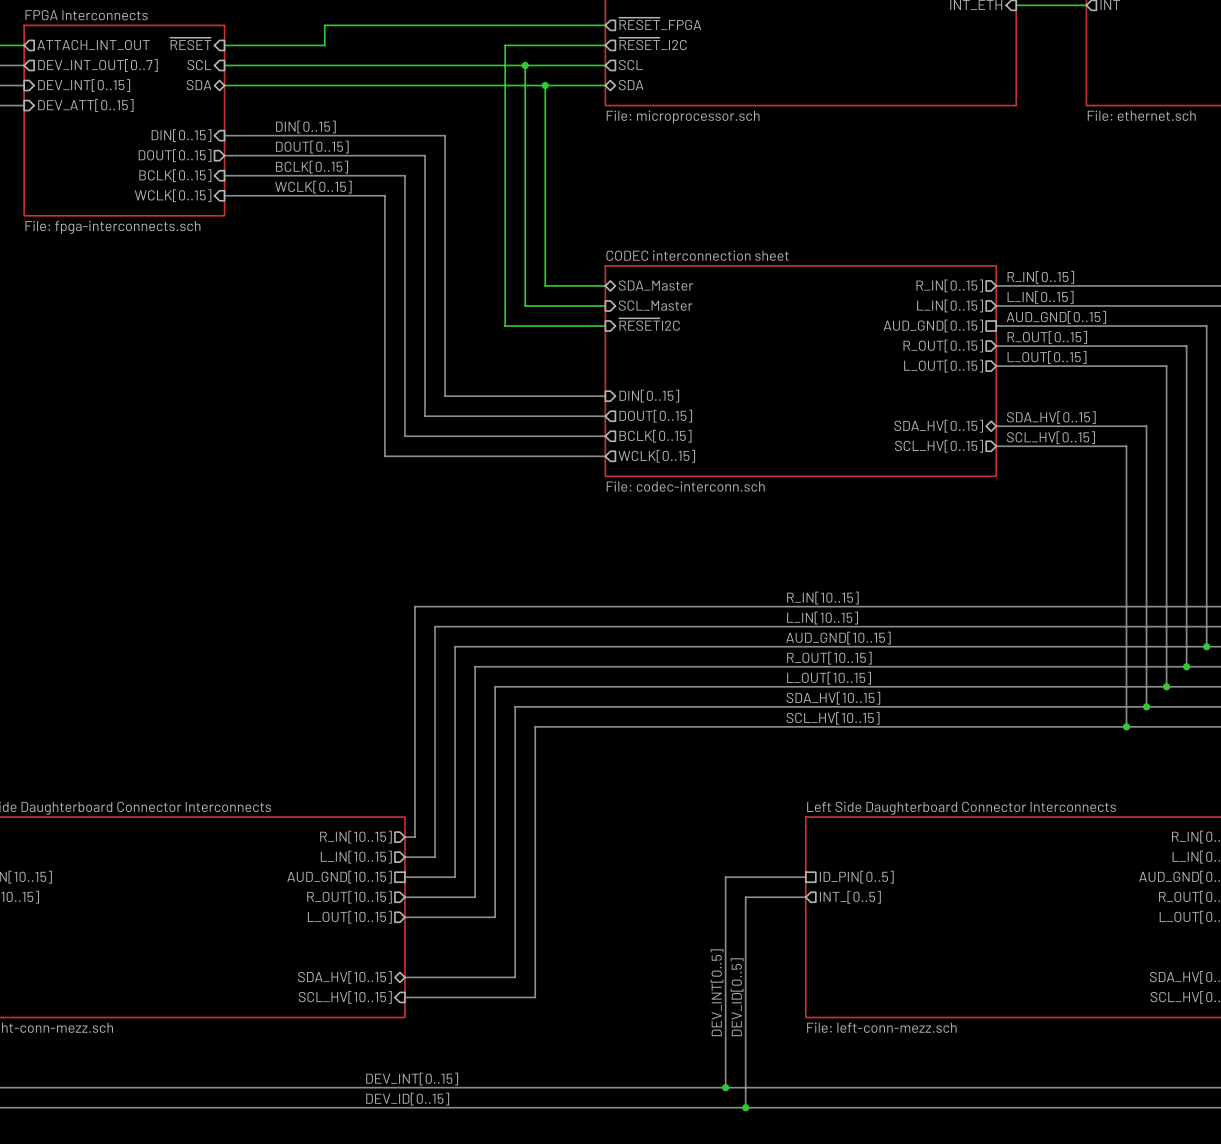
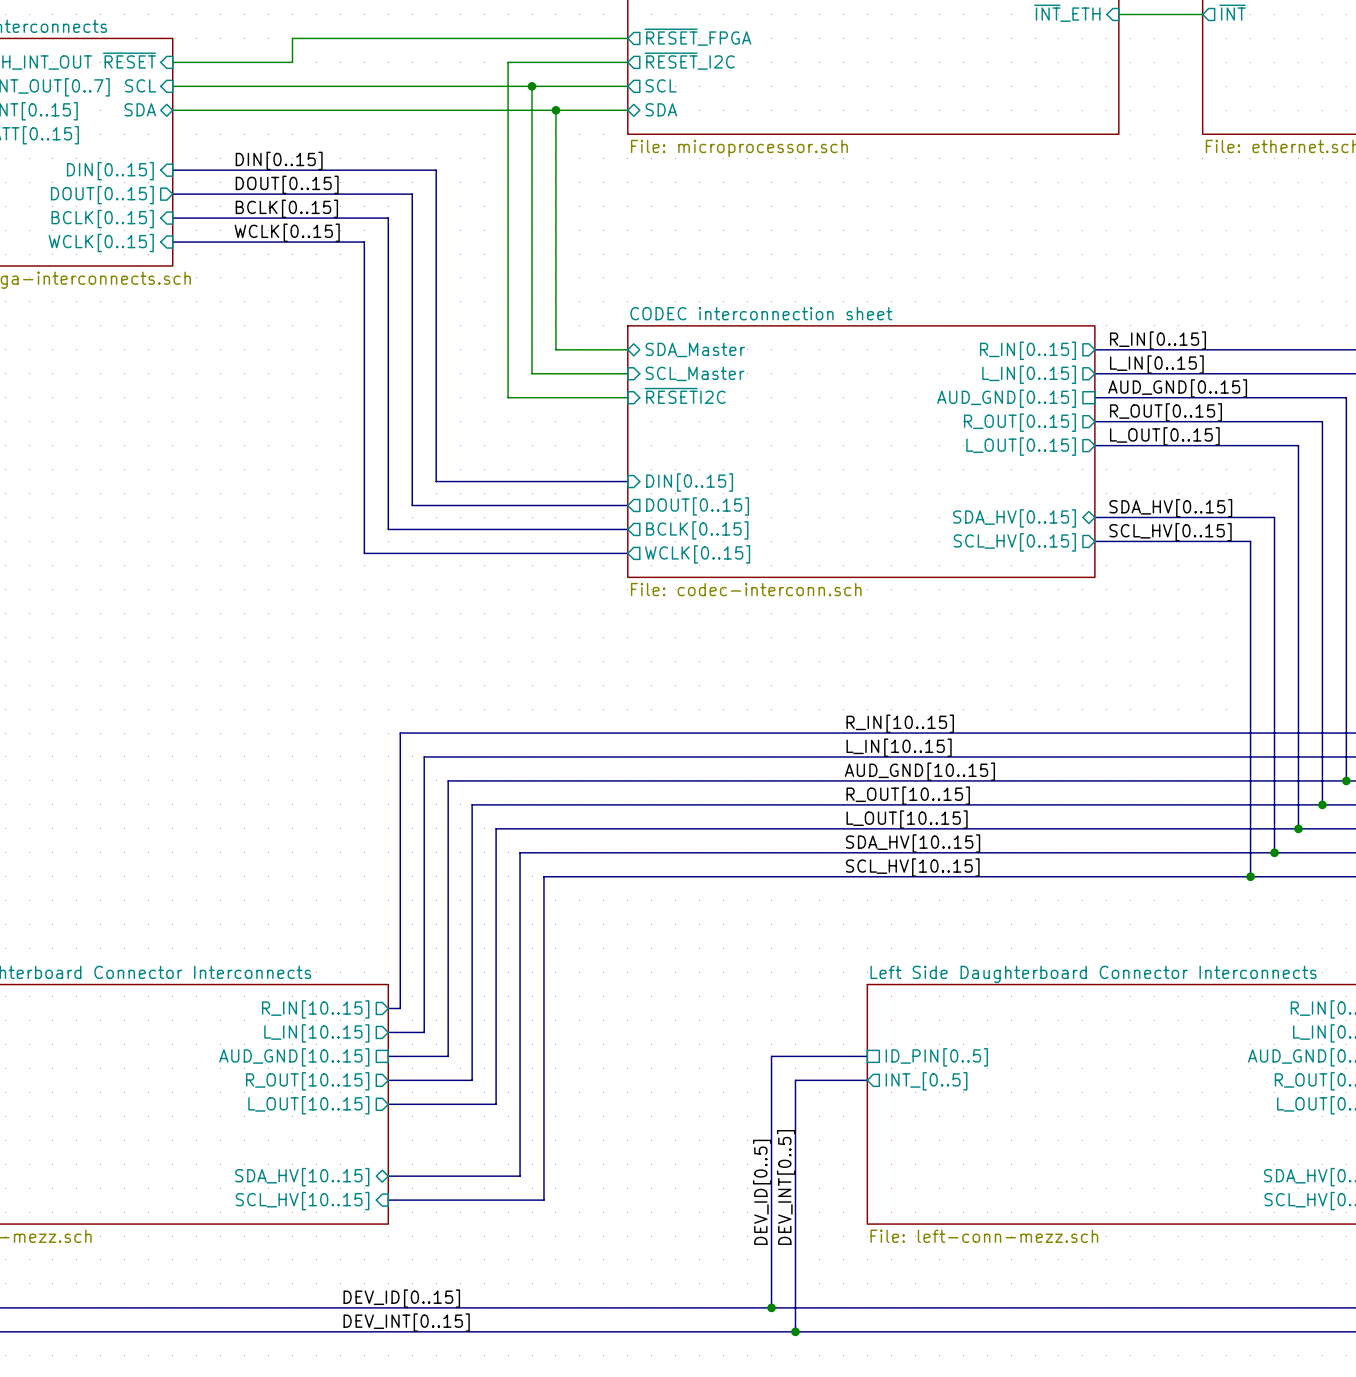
label: DEV_INT[0..5] (717, 992) -> DEV_ID[0..5] (762, 1192)
label: DEV_ID[0..5] (737, 997) -> DEV_INT[0..5] (786, 1187)
label: DEV_INT[0..15] (412, 1079) -> DEV_ID[0..15] (401, 1298)
label: DEV_ID[0..15] (407, 1099) -> DEV_INT[0..15] (406, 1322)

